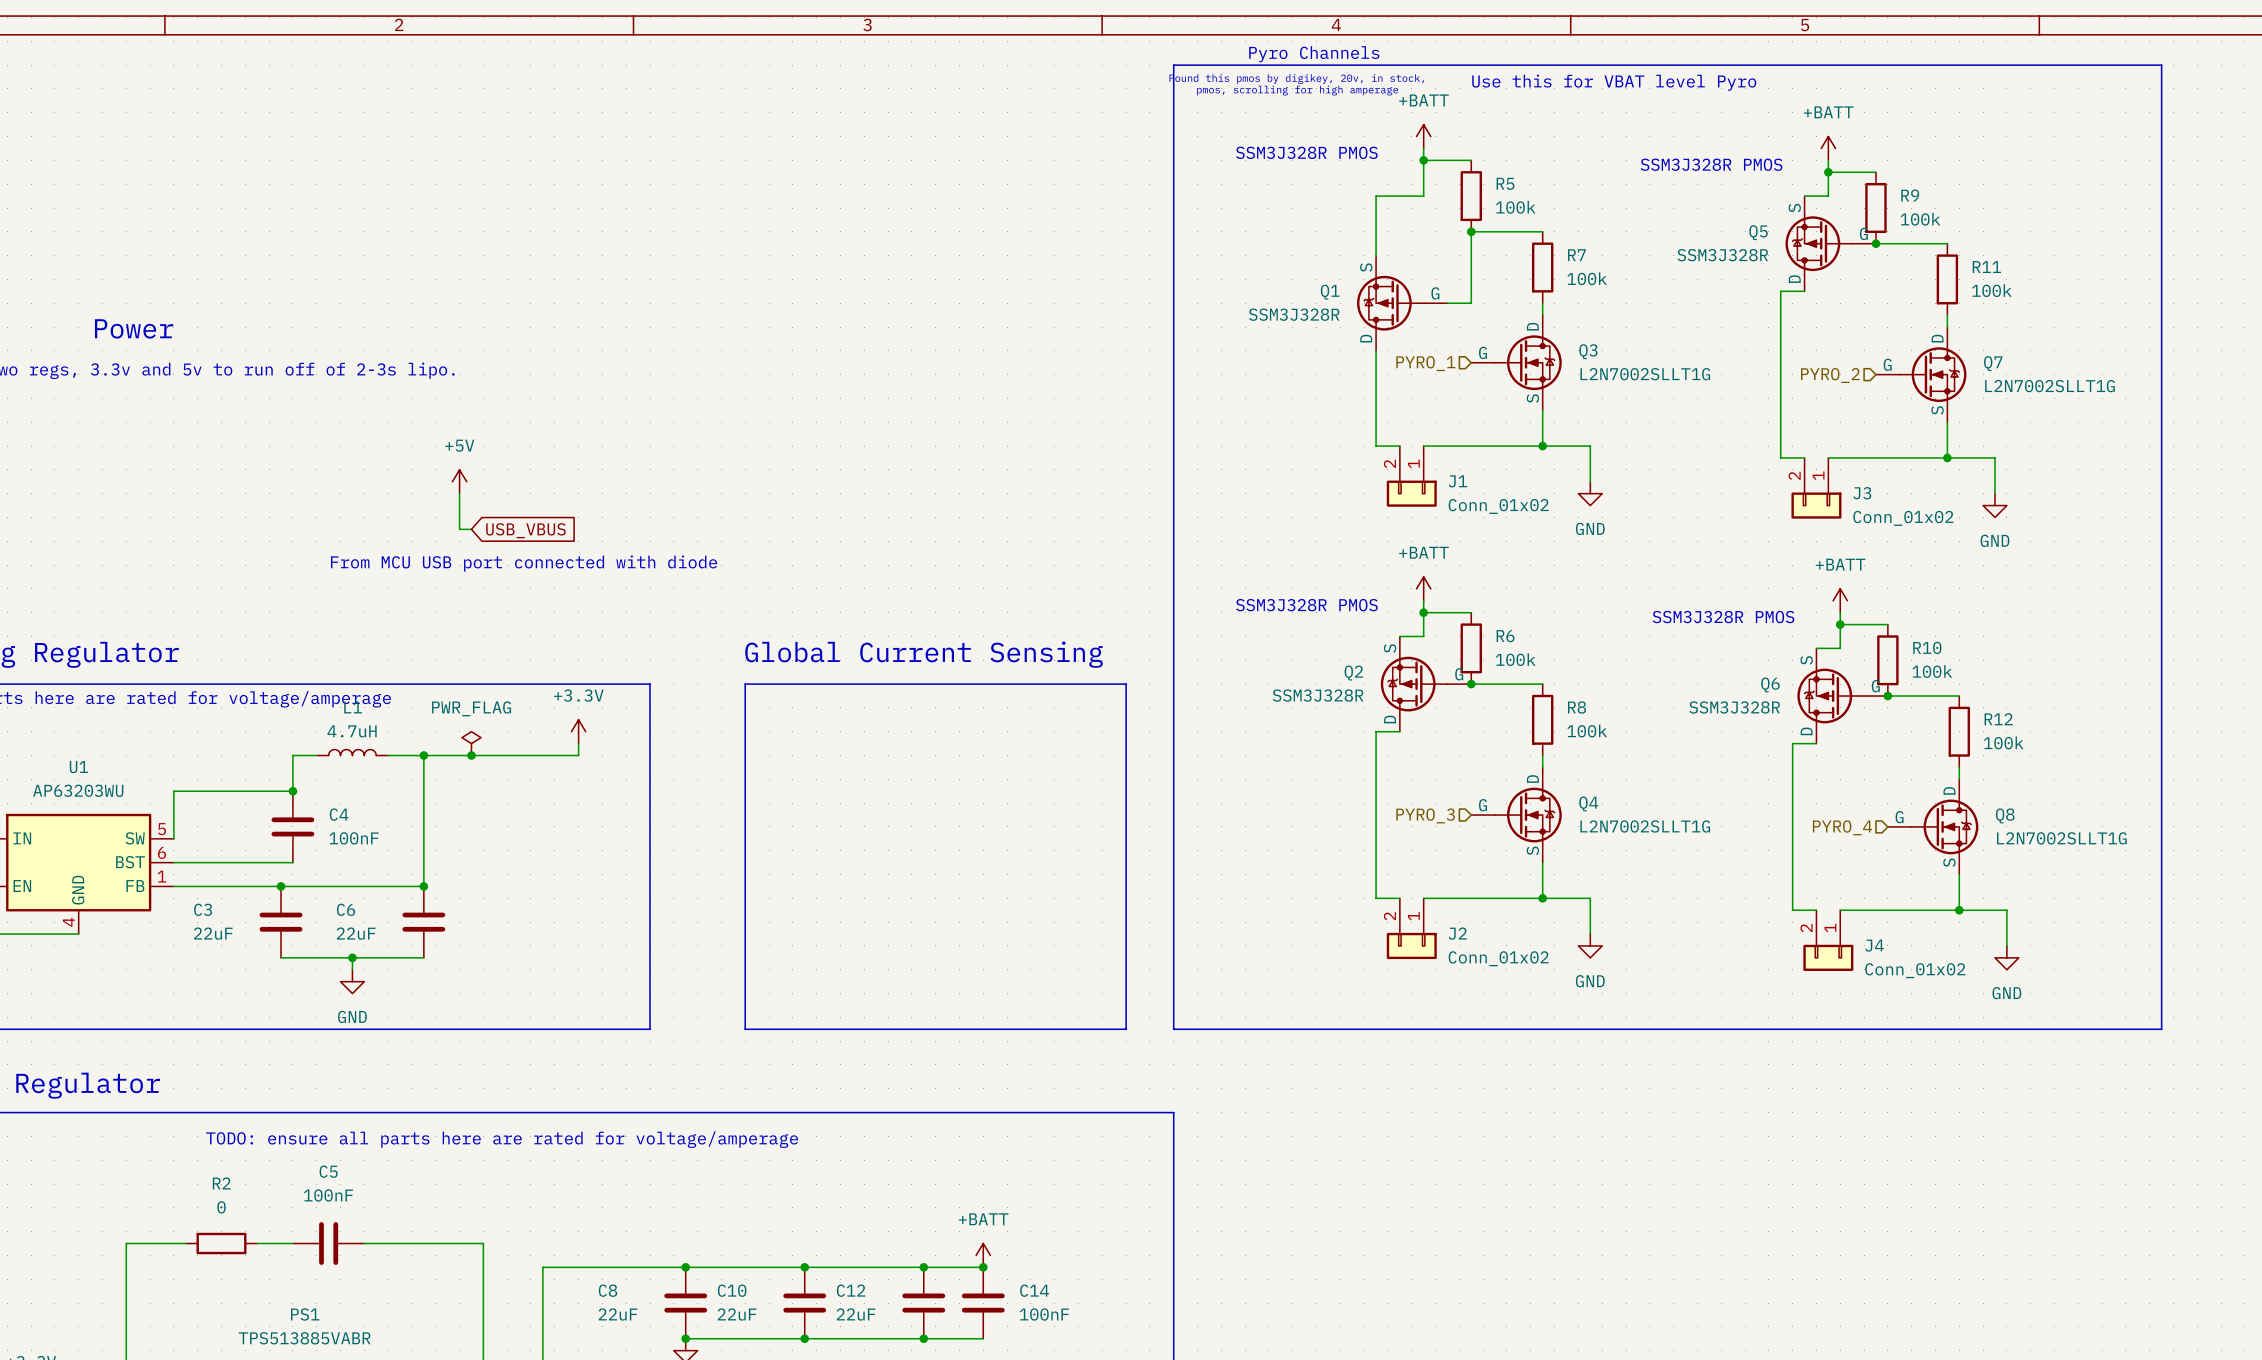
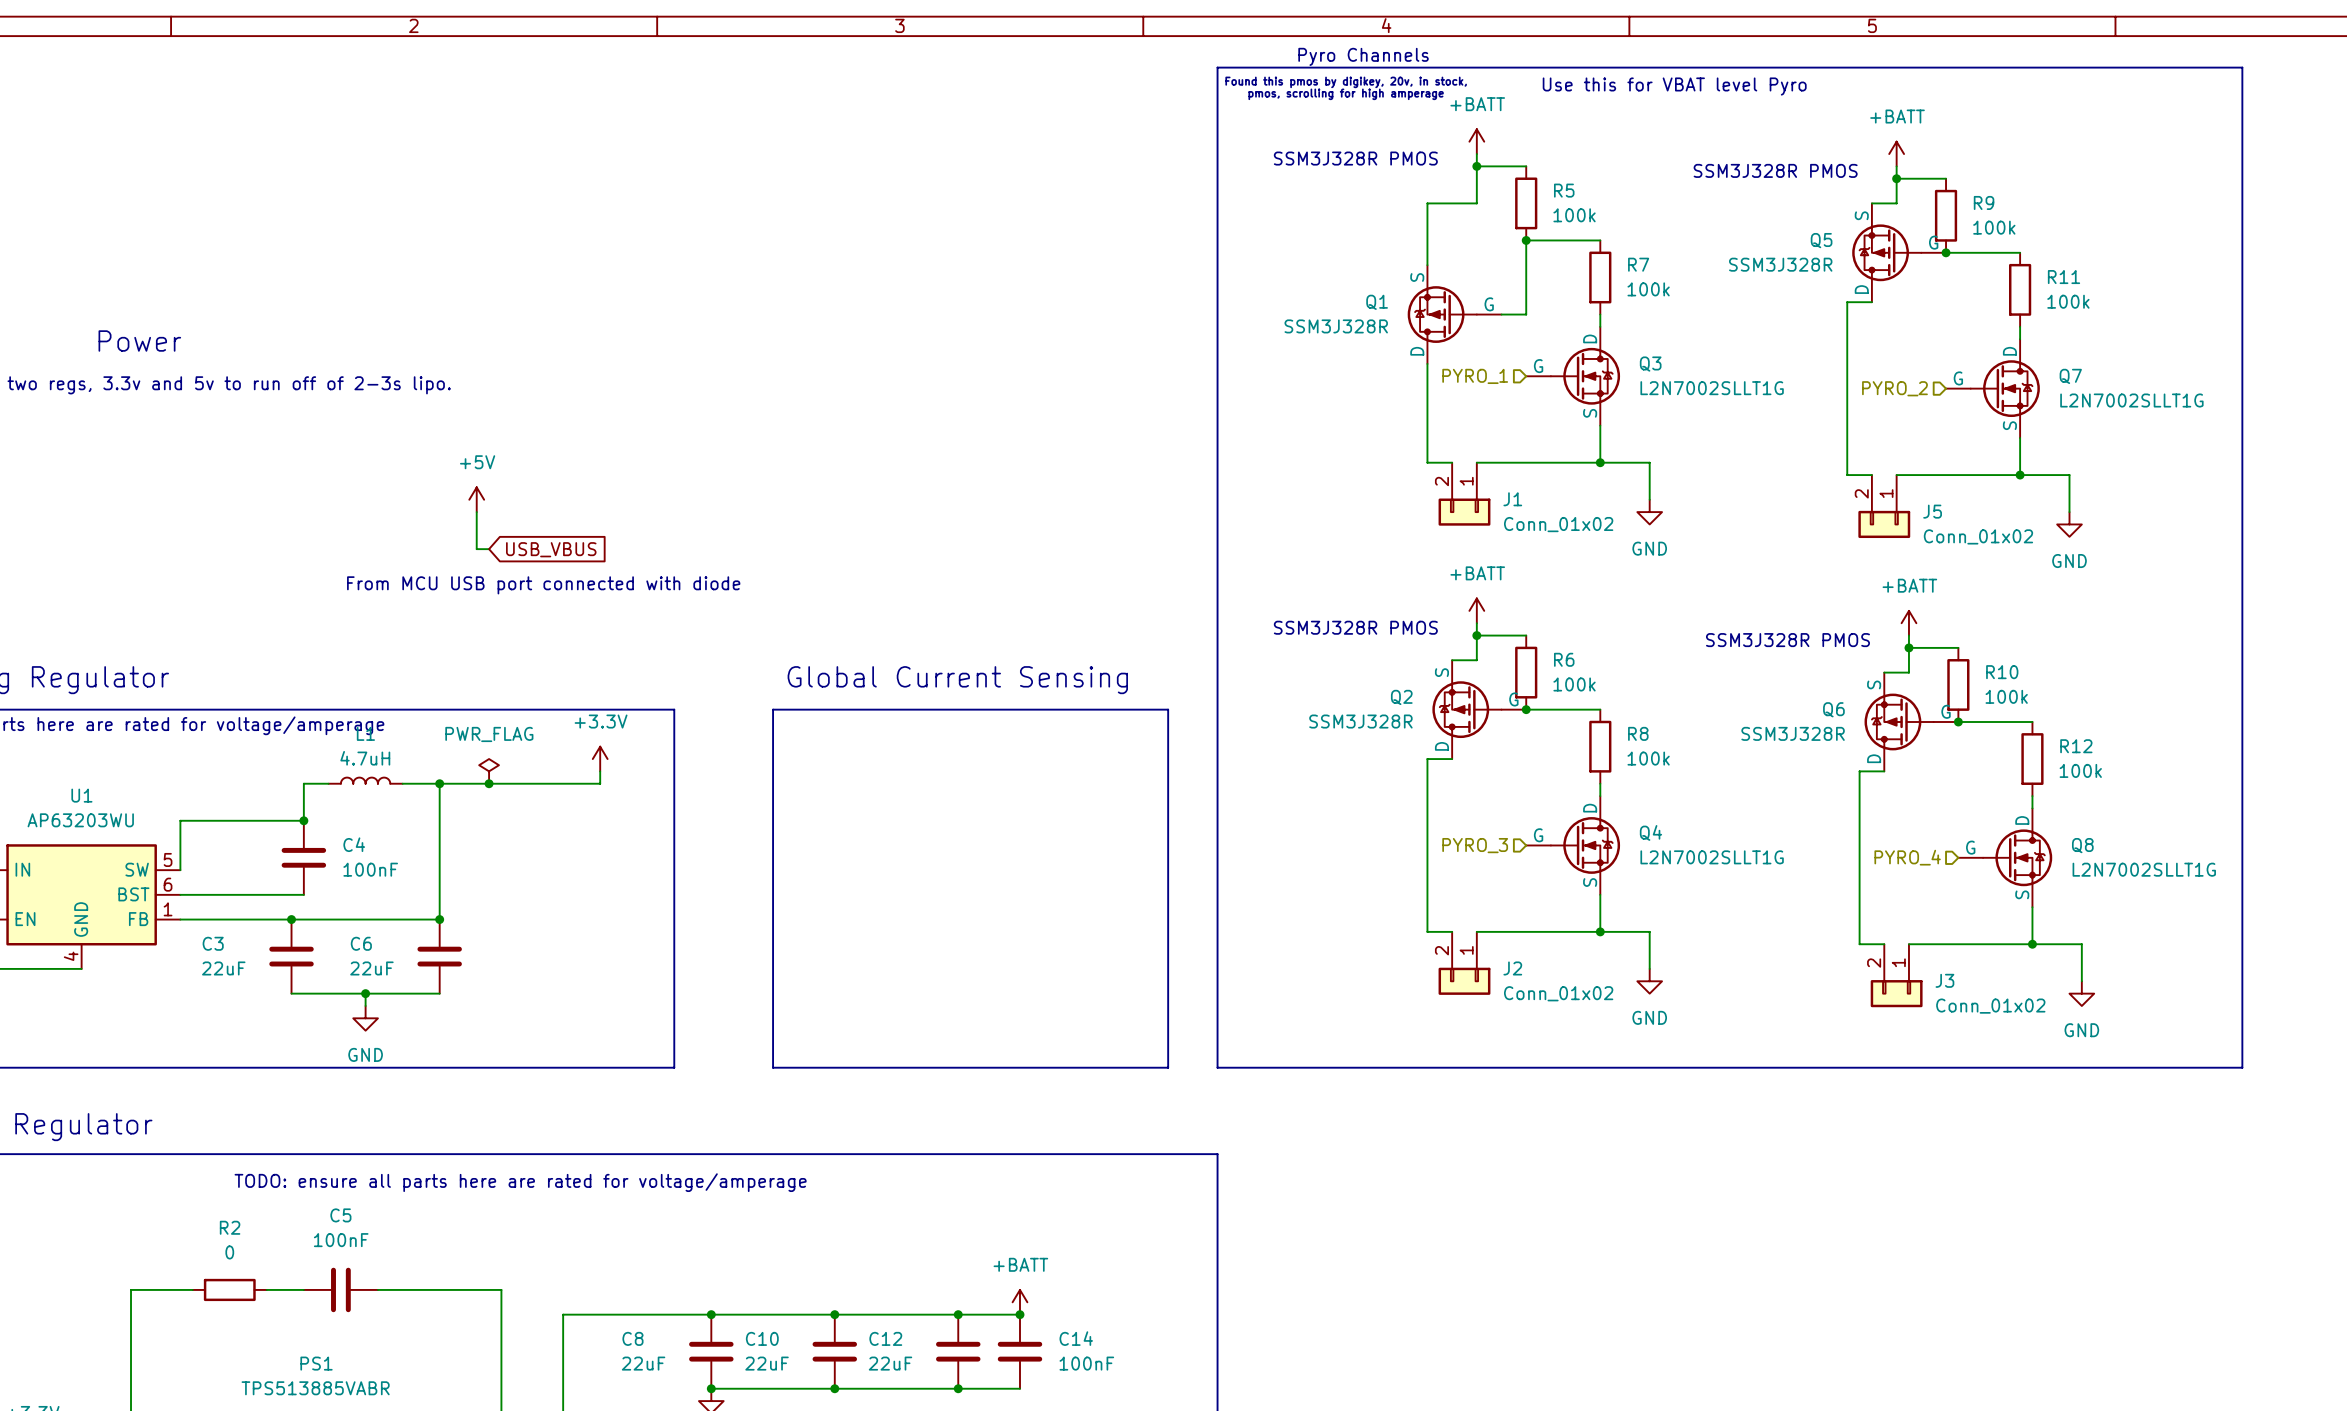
J3 name: J3 (1862, 493) -> J5 (1932, 511)
J4 name: J4 (1874, 945) -> J3 (1944, 980)

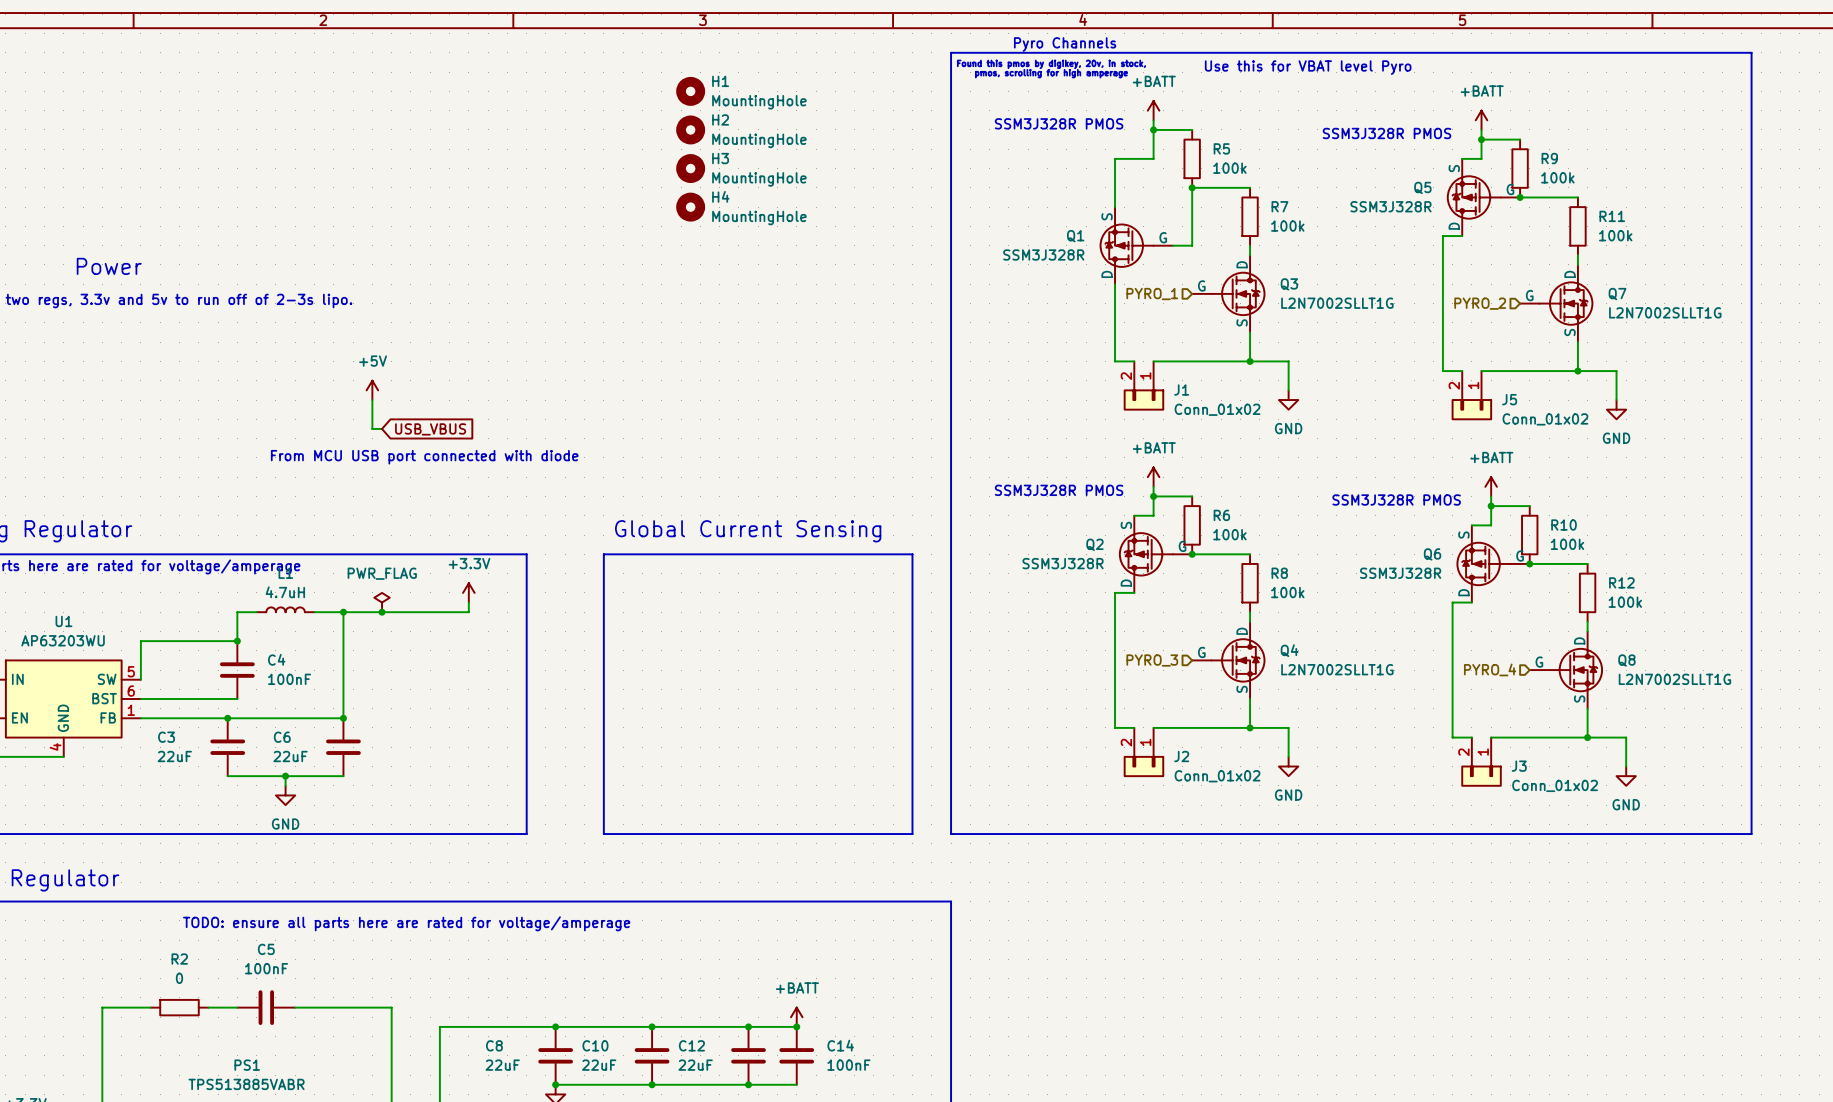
H1: none -> MountingHole (690, 91)
H2: none -> MountingHole (690, 129)
H3: none -> MountingHole (690, 168)
H4: none -> MountingHole (690, 207)

